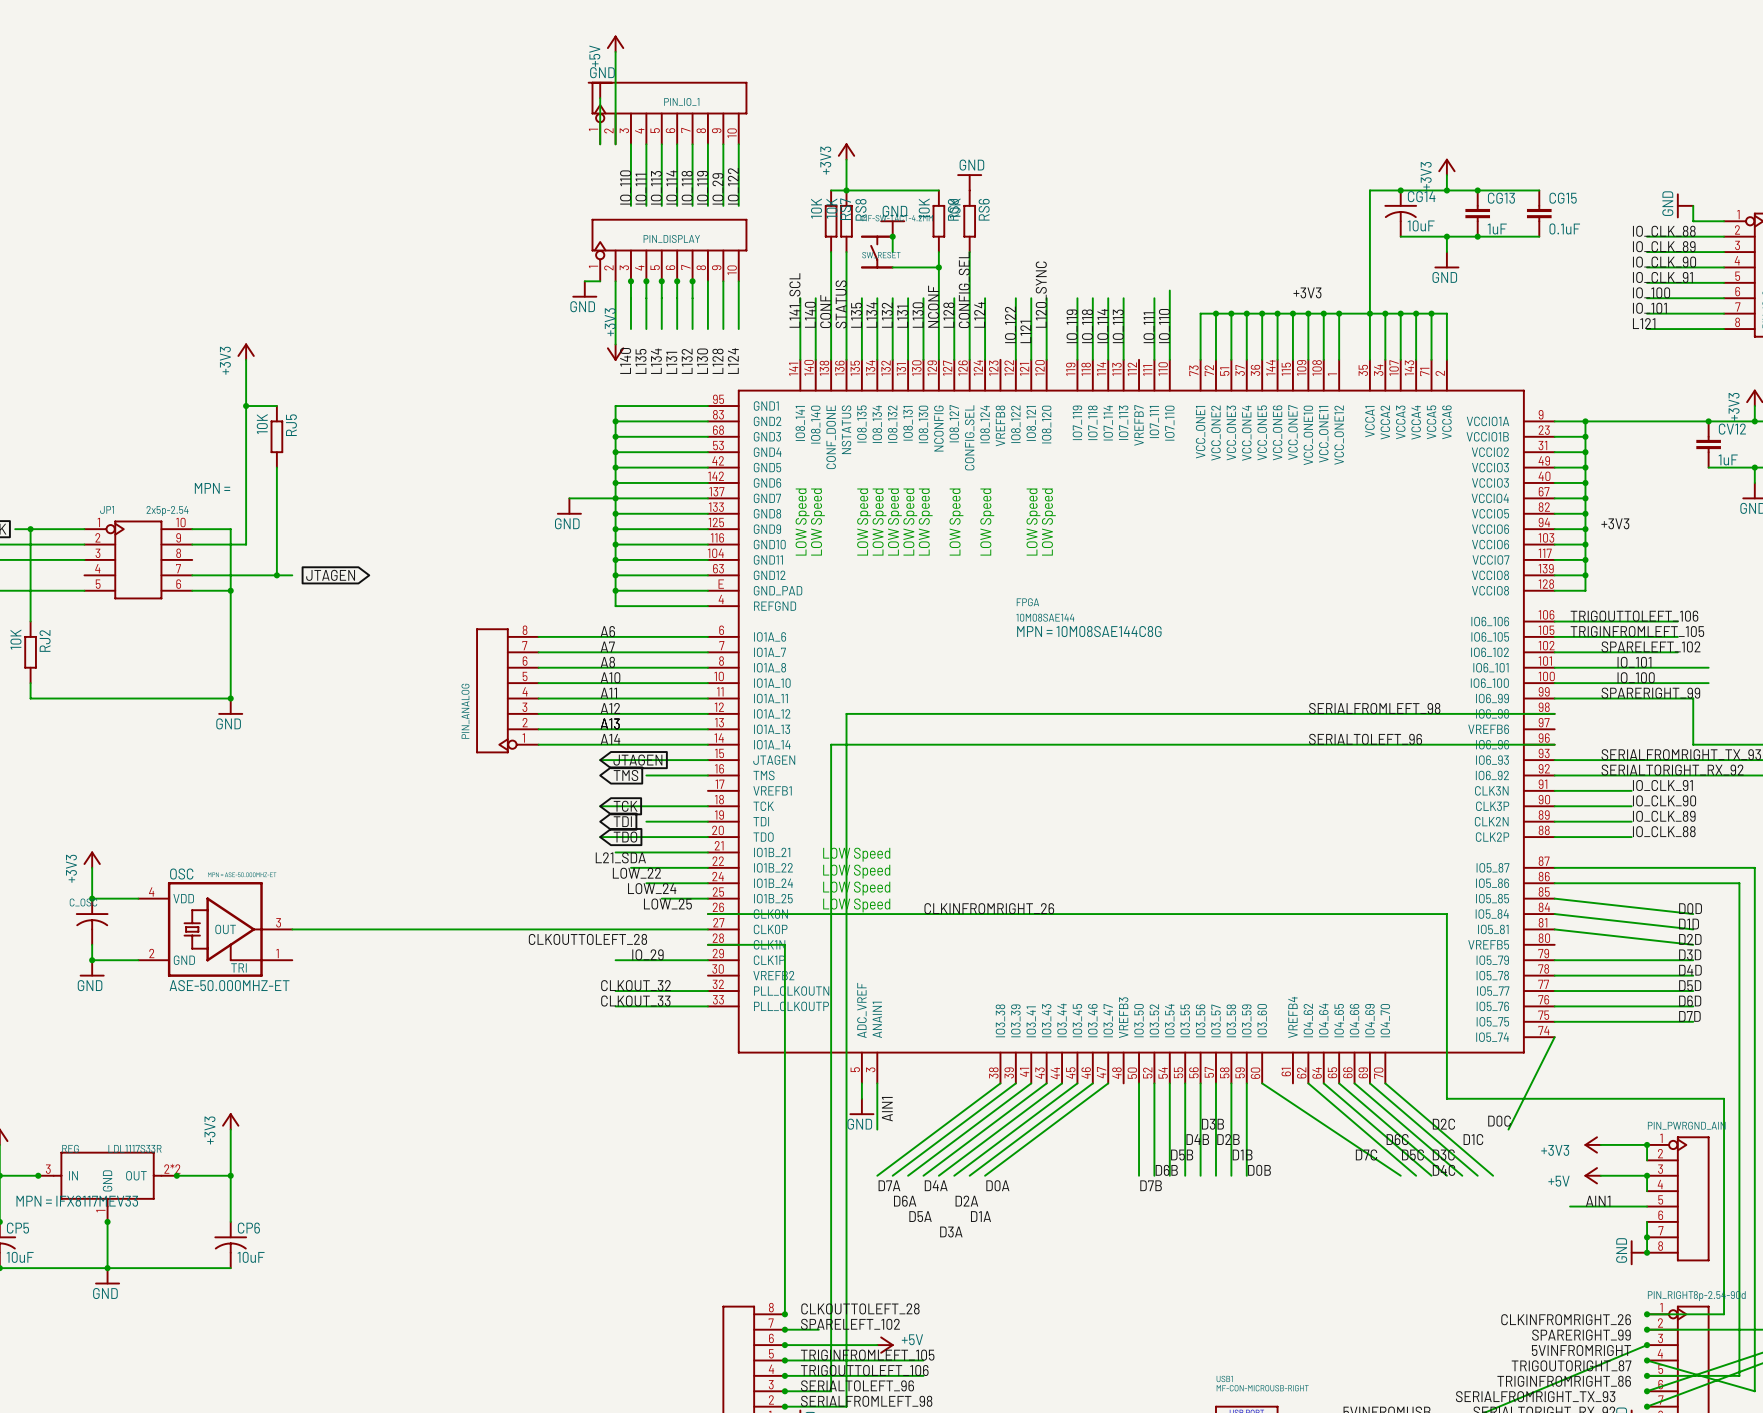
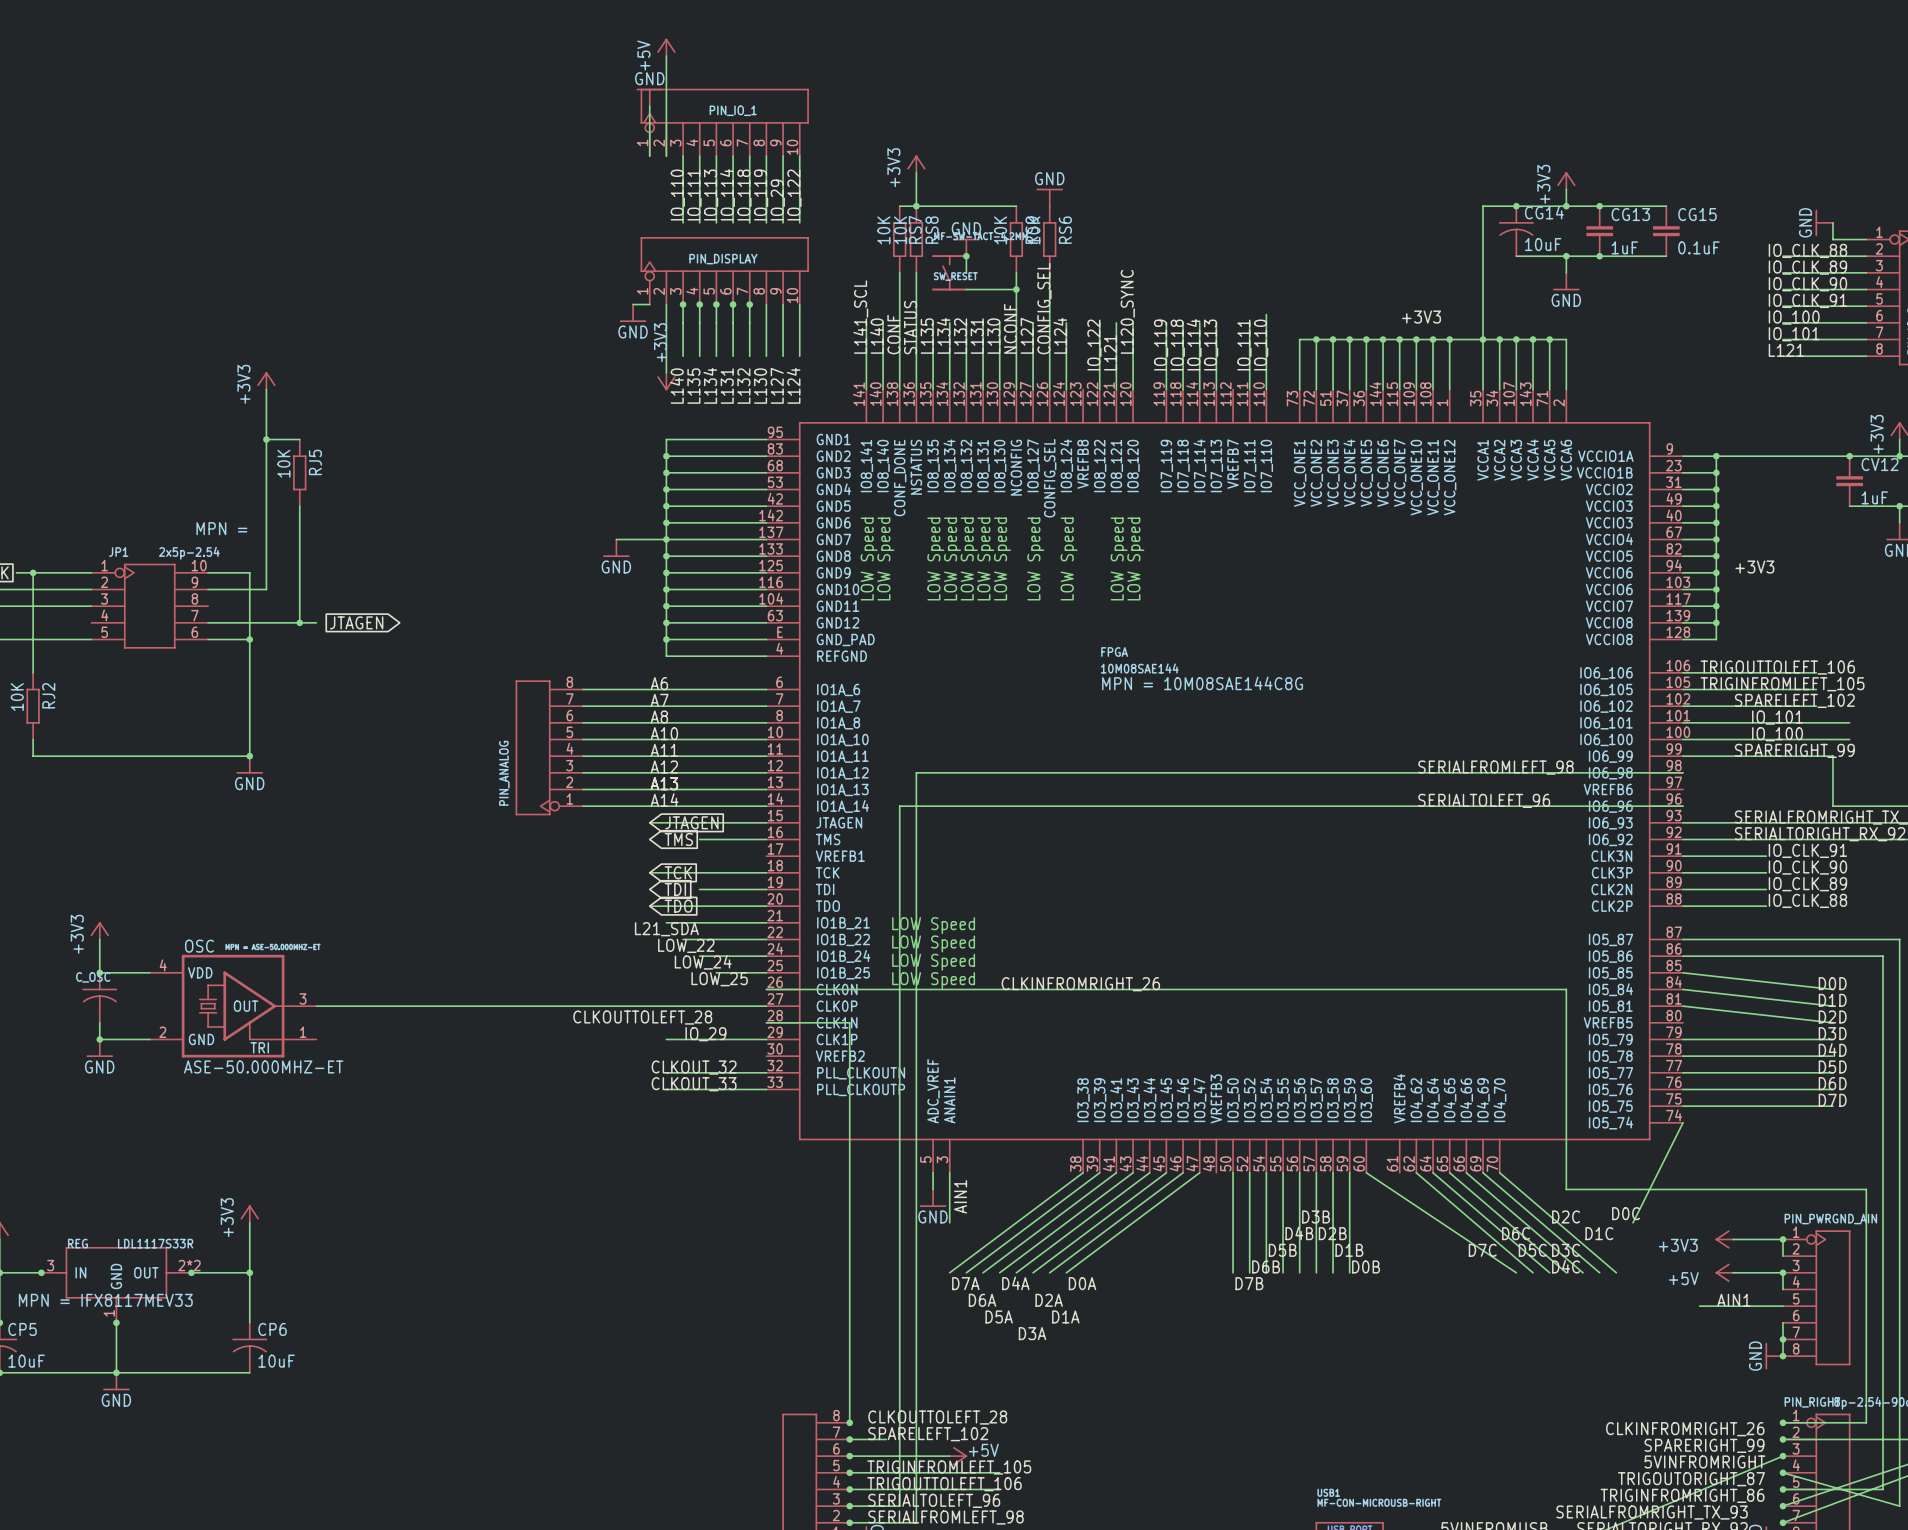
label: L128 (948, 315) -> L127 (1027, 335)
label: L128 (717, 361) -> L127 (777, 385)

